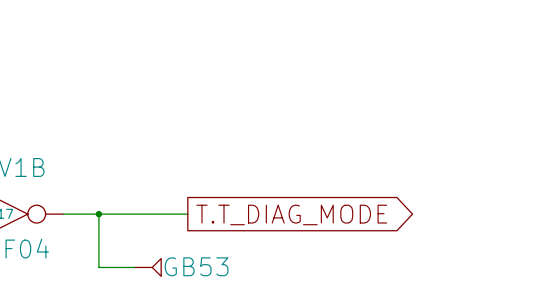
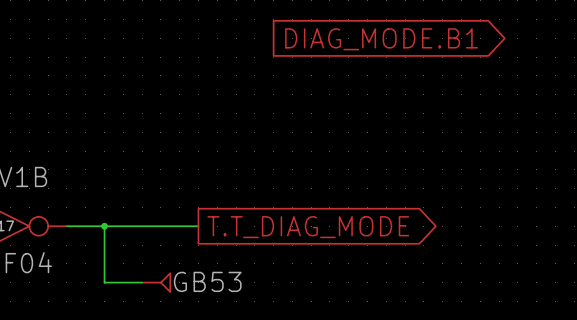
global label: none -> DIAG_MODE.B1 (381, 39)

